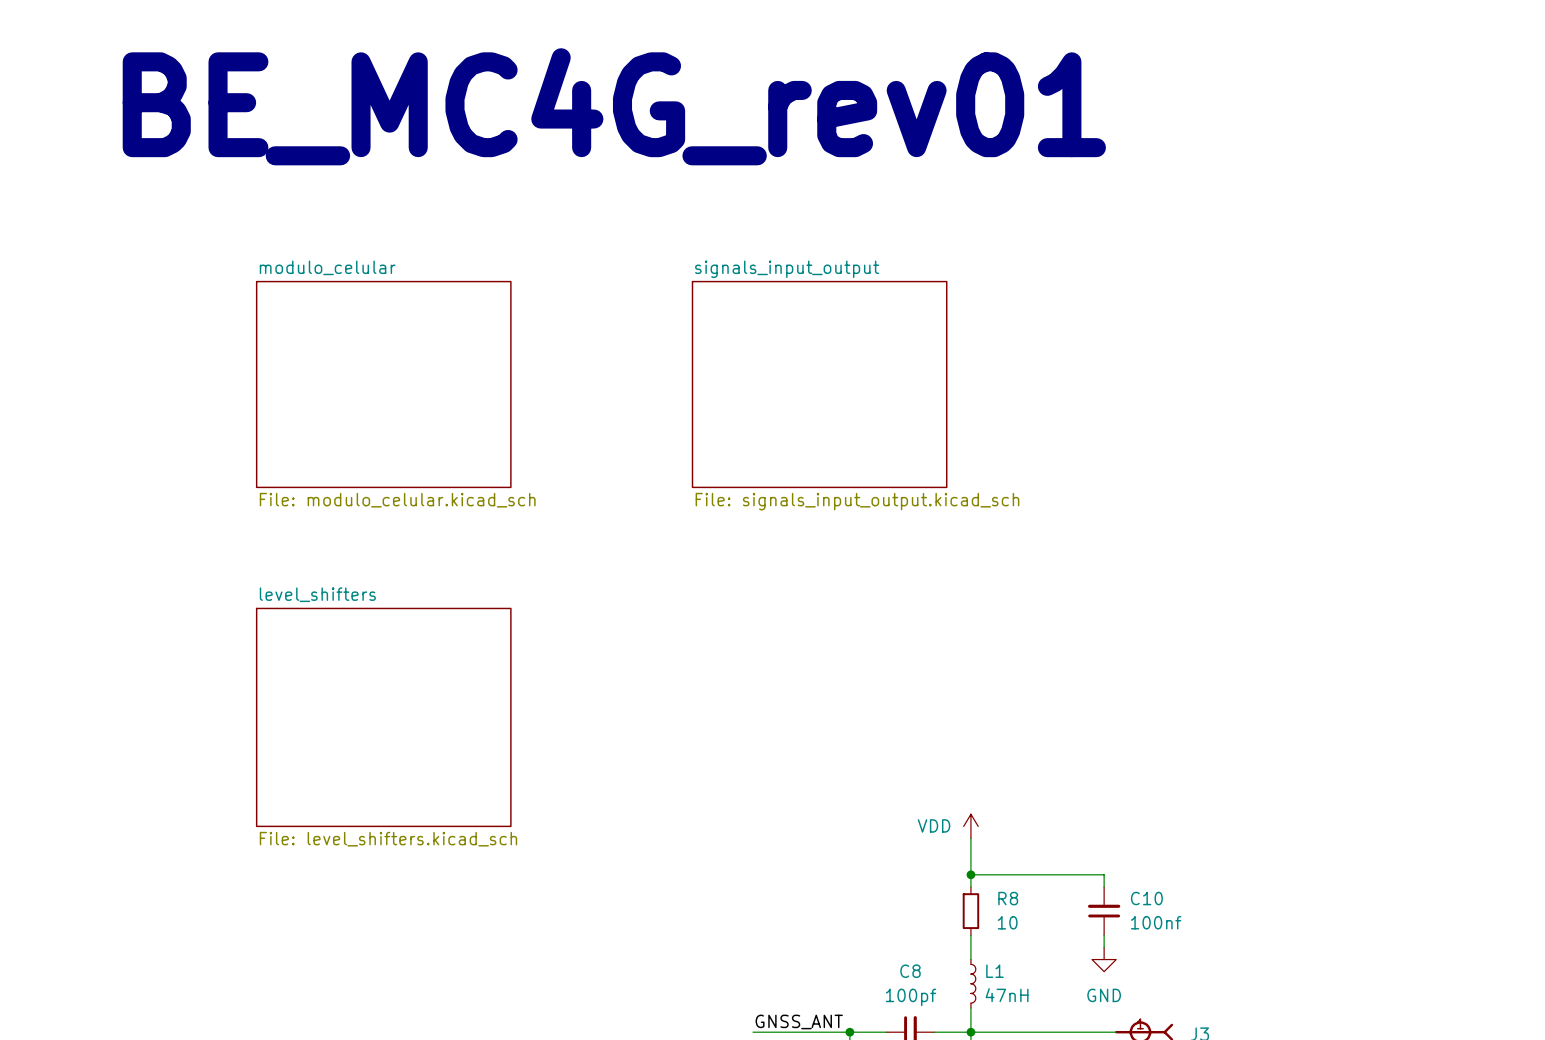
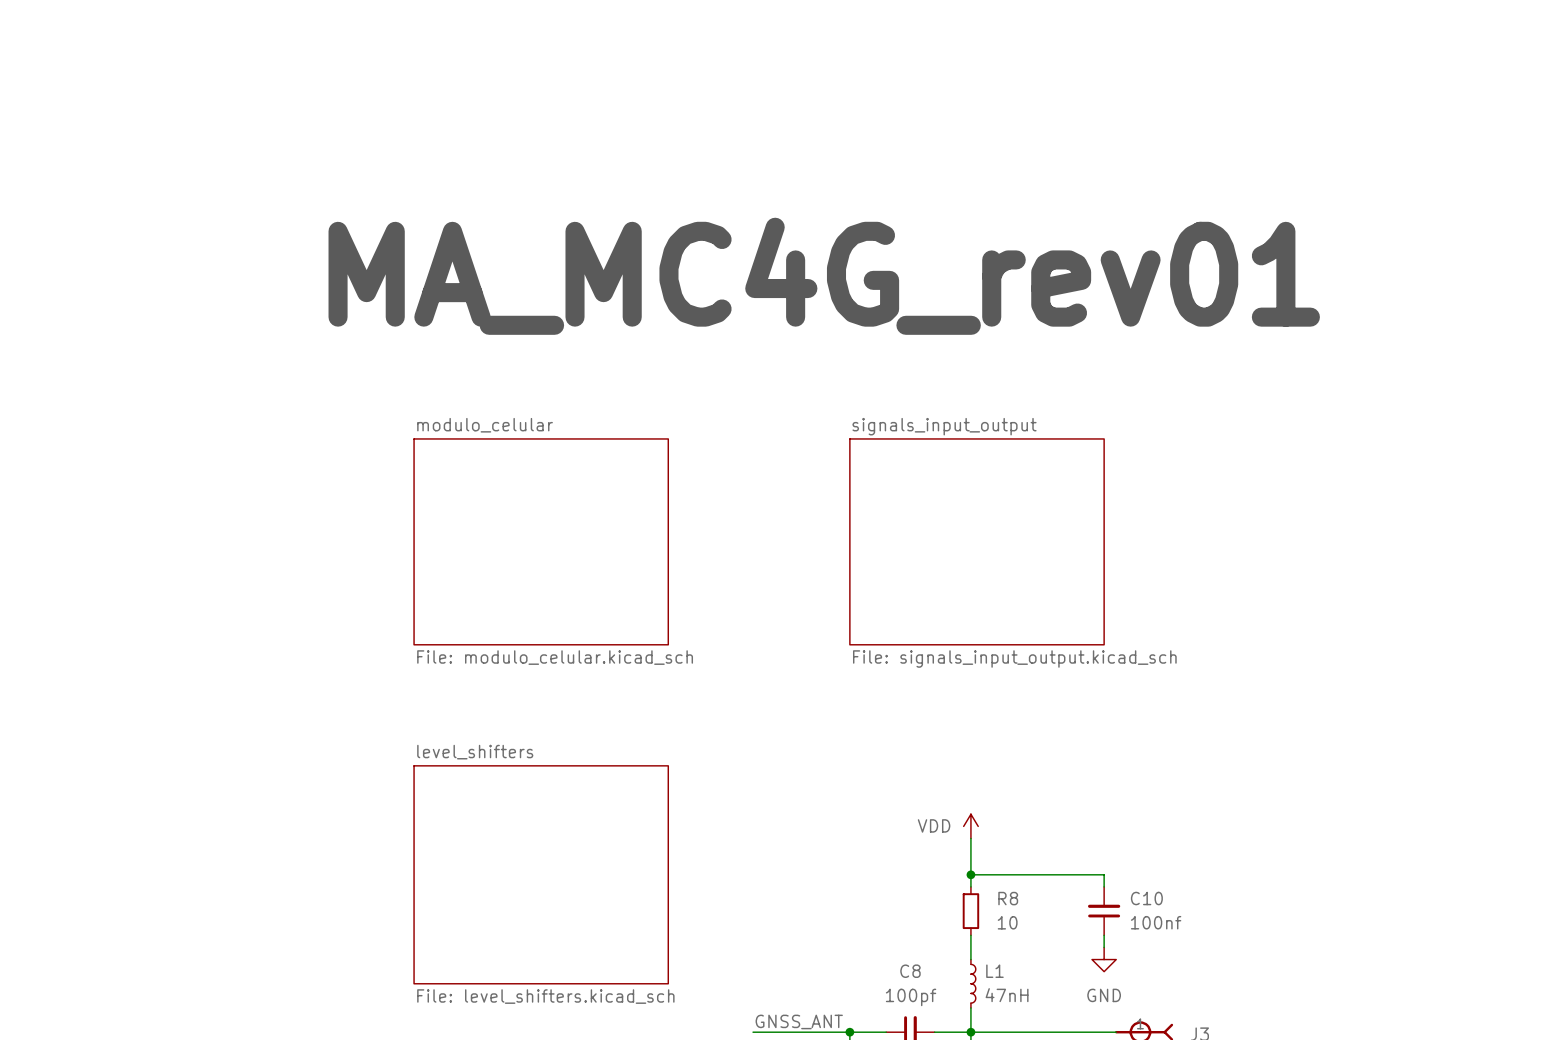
text: BE_MC4G_rev01 (614, 106) -> none
text: none -> MA_MC4G_rev01 (824, 276)
sheet modulo_celular position: (383, 384) -> (541, 541)
sheet signals_input_output position: (819, 384) -> (977, 541)
sheet level_shifters position: (383, 717) -> (541, 874)

